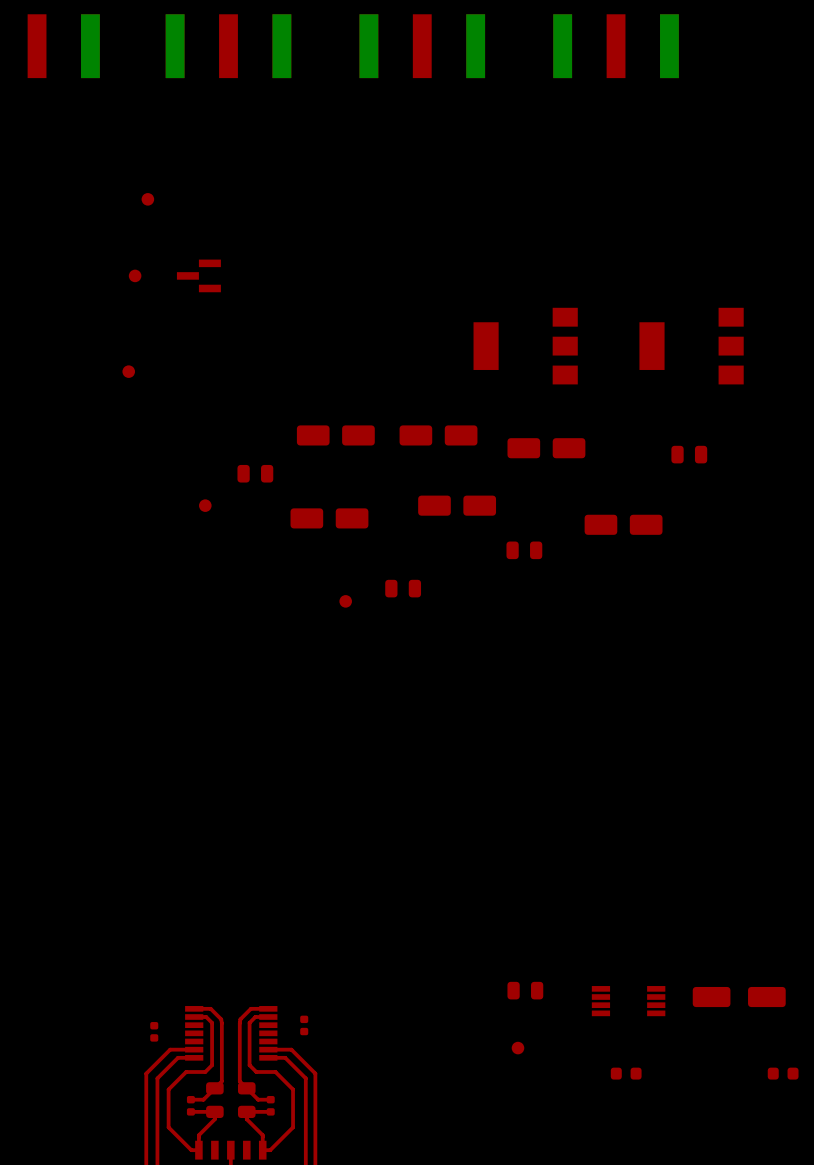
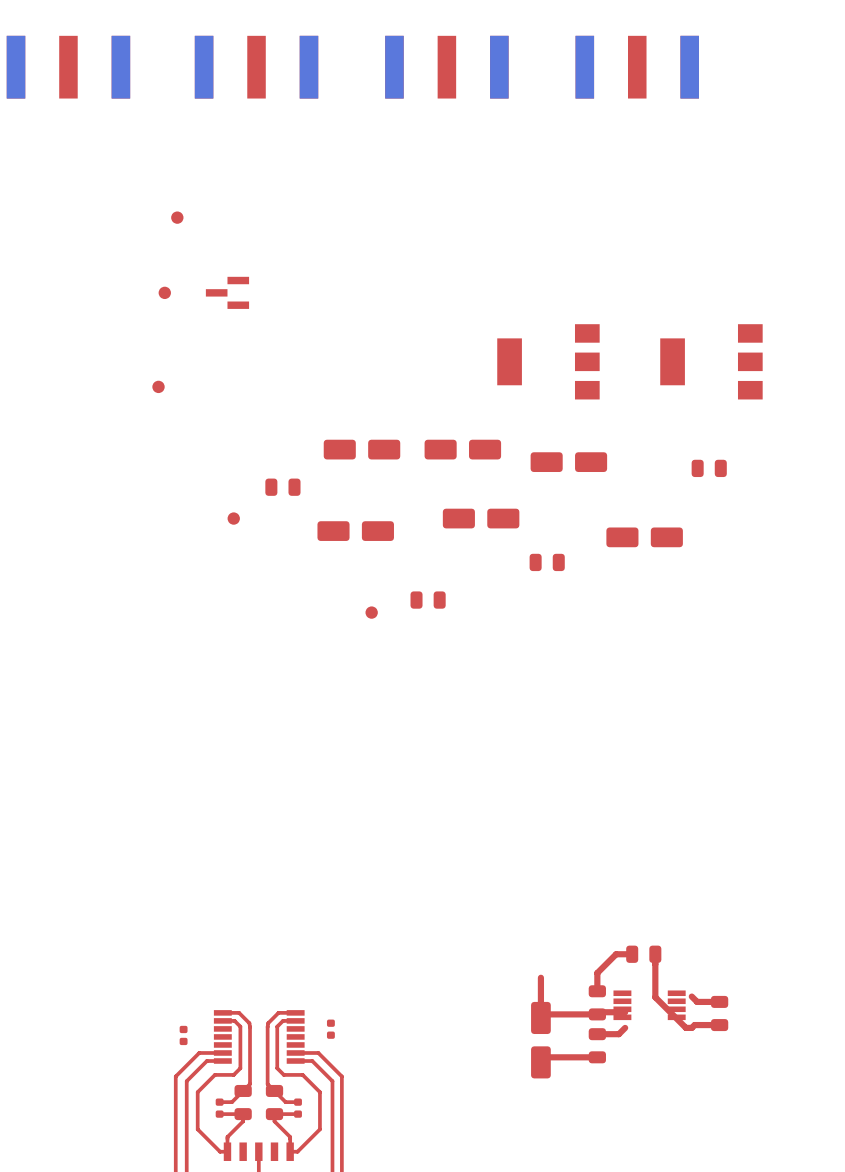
top track: none -> (632, 954) (616, 954) (597, 973) (597, 991)
part: none -> (643, 954)
top track: none -> (655, 954) (655, 997) (685, 1027) (691, 1027) (694, 1025) (719, 1025)
top track: none -> (540, 977) (540, 1017) (544, 1014) (625, 1012)
part: (525, 990) -> none
top track: none -> (691, 996) (697, 1001) (719, 1001)
part: (739, 997) -> none
part: none -> (597, 1002)
part: none -> (719, 1013)
top track: none -> (625, 1027) (618, 1034) (597, 1034)
part footprint: [511, 1041, 525, 1055] -> [531, 1001, 551, 1079]
part: none -> (597, 1045)
top track: none -> (597, 1057) (546, 1057) (540, 1062)
part: (626, 1073) -> none
part: (783, 1073) -> none

